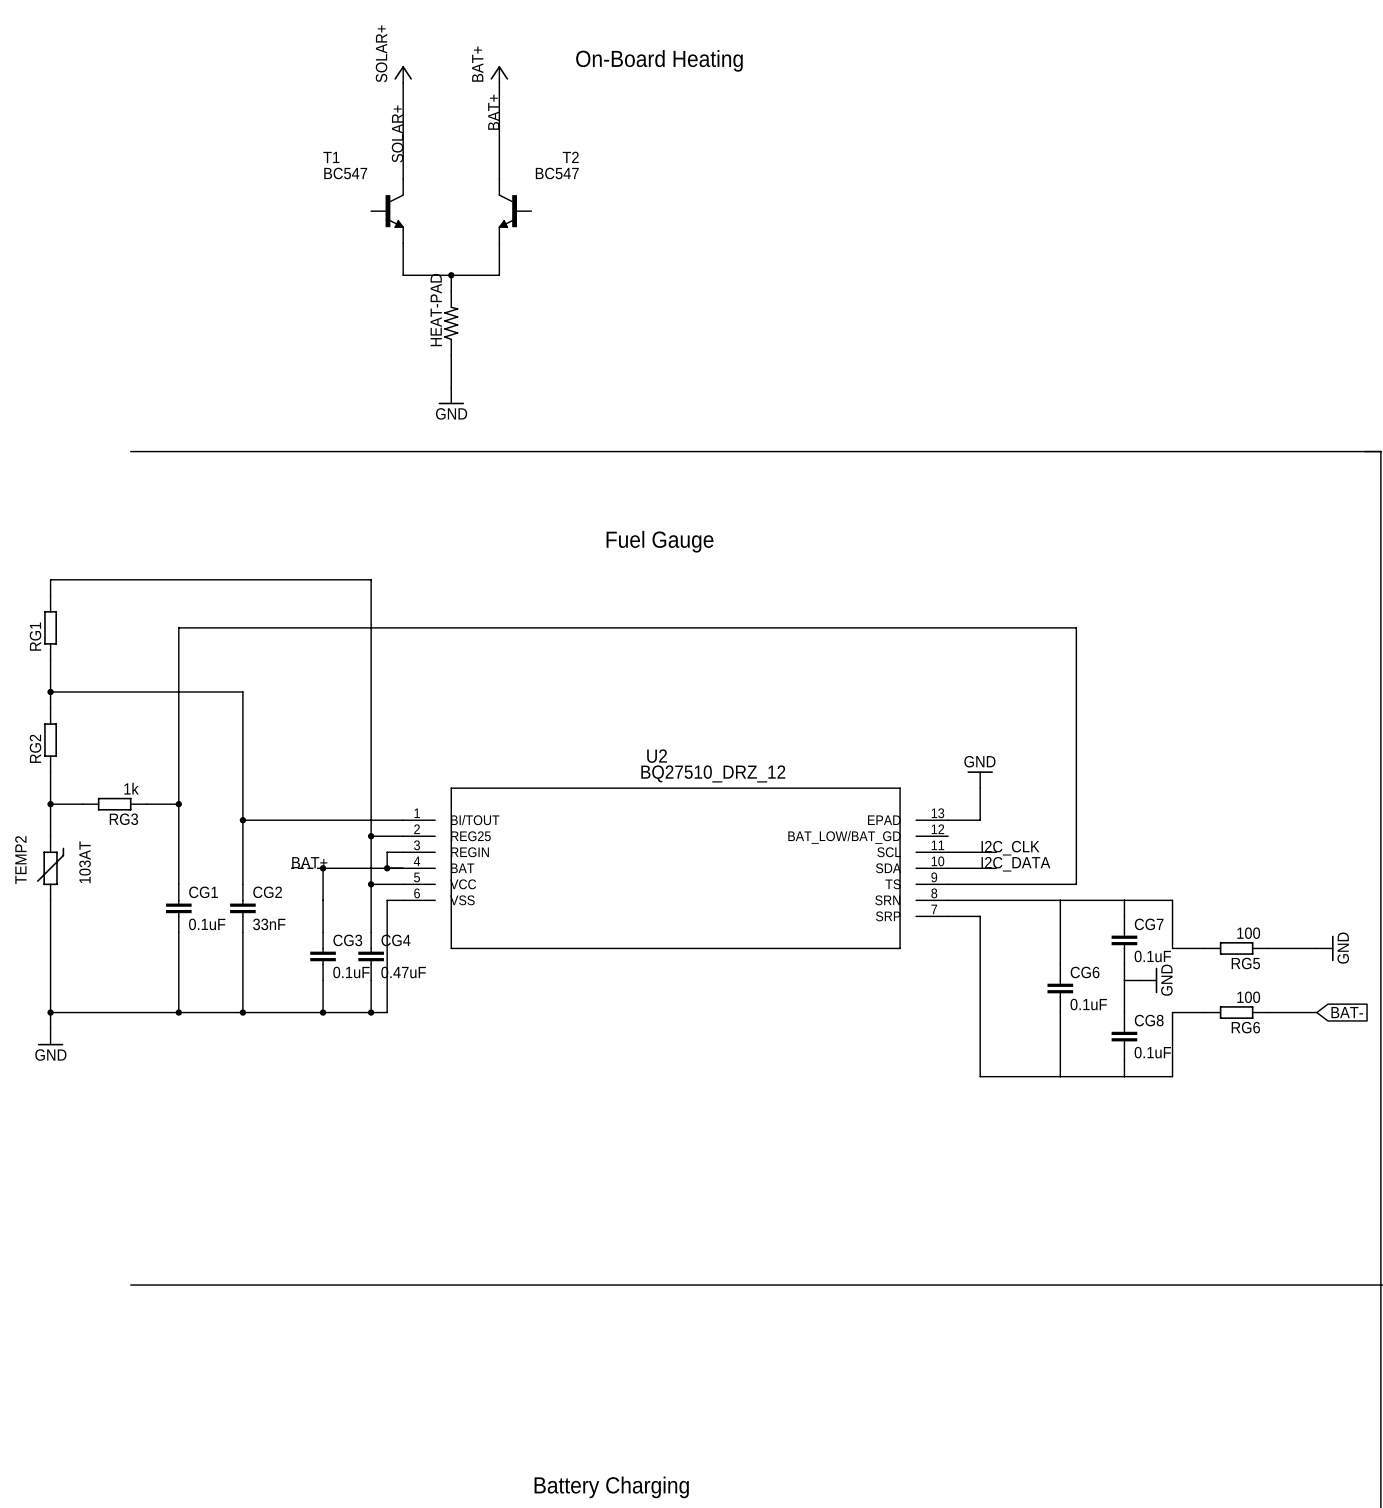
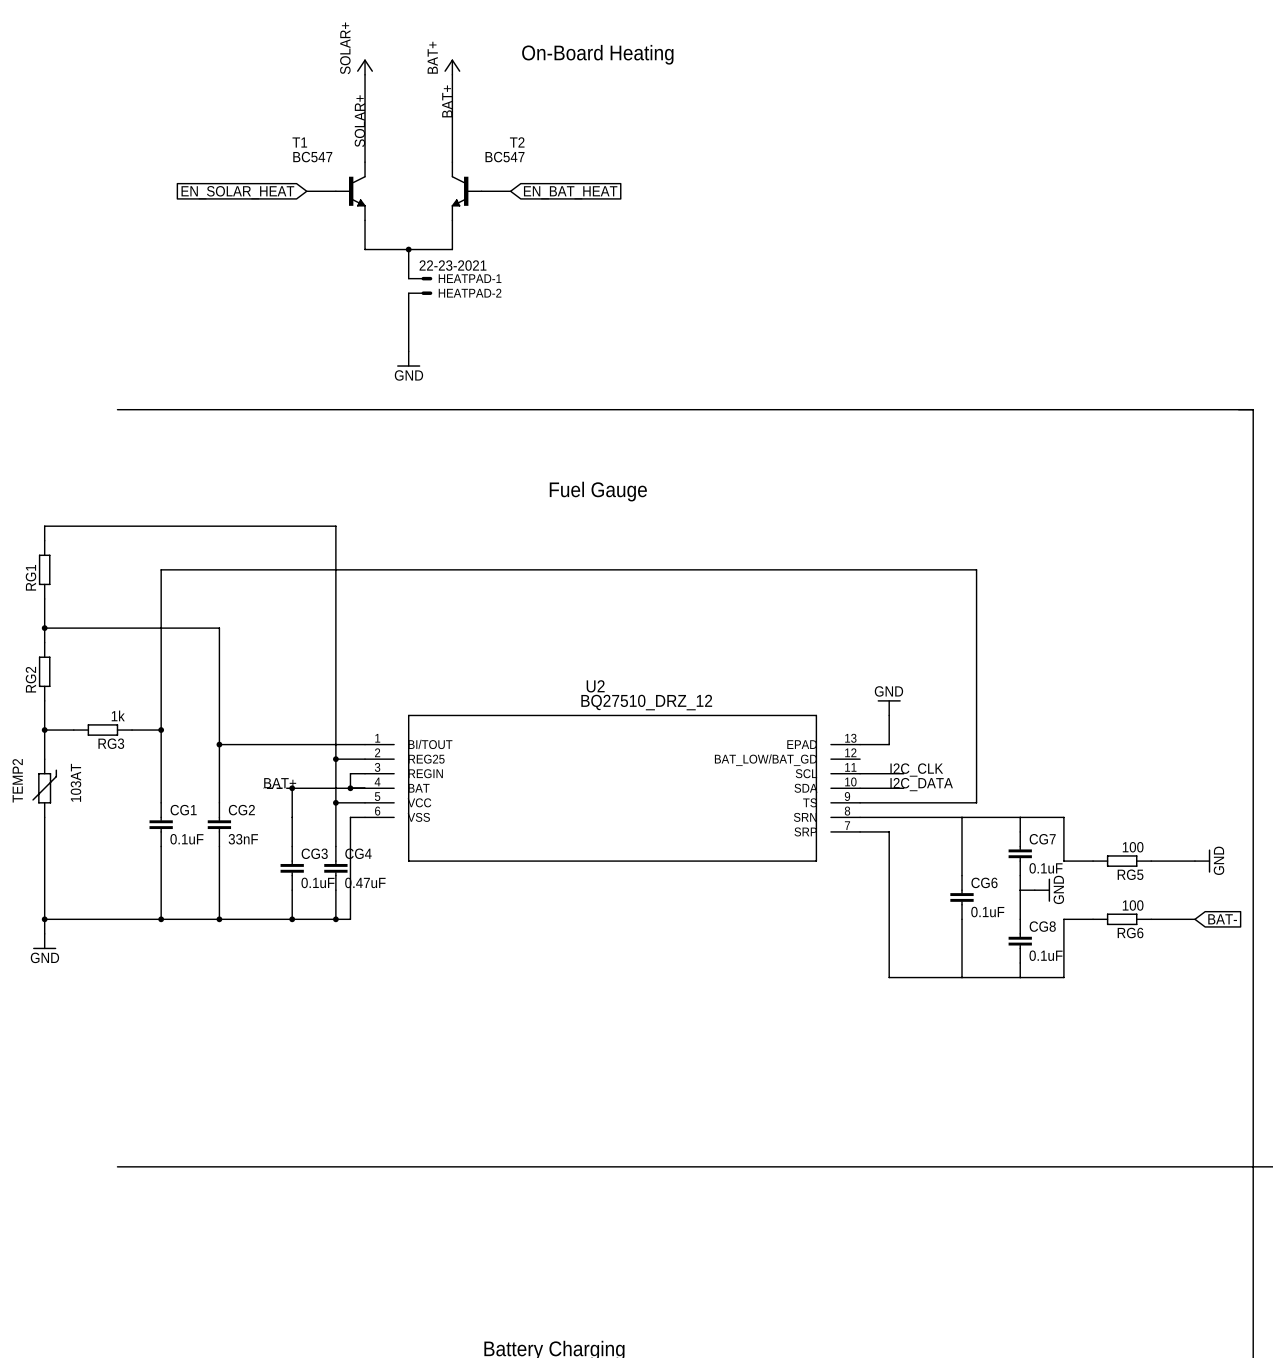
wire: none -> (306, 191) (335, 191)
wire: none -> (481, 191) (510, 191)
global label: none -> EN_SOLAR_HEAT (237, 192)
global label: none -> EN_BAT_HEAT (570, 192)
HEATPAD-1: none -> 22-23-2021 (420, 278)
HEAT-PAD: (451, 323) -> none
HEATPAD-2: none -> (420, 293)

